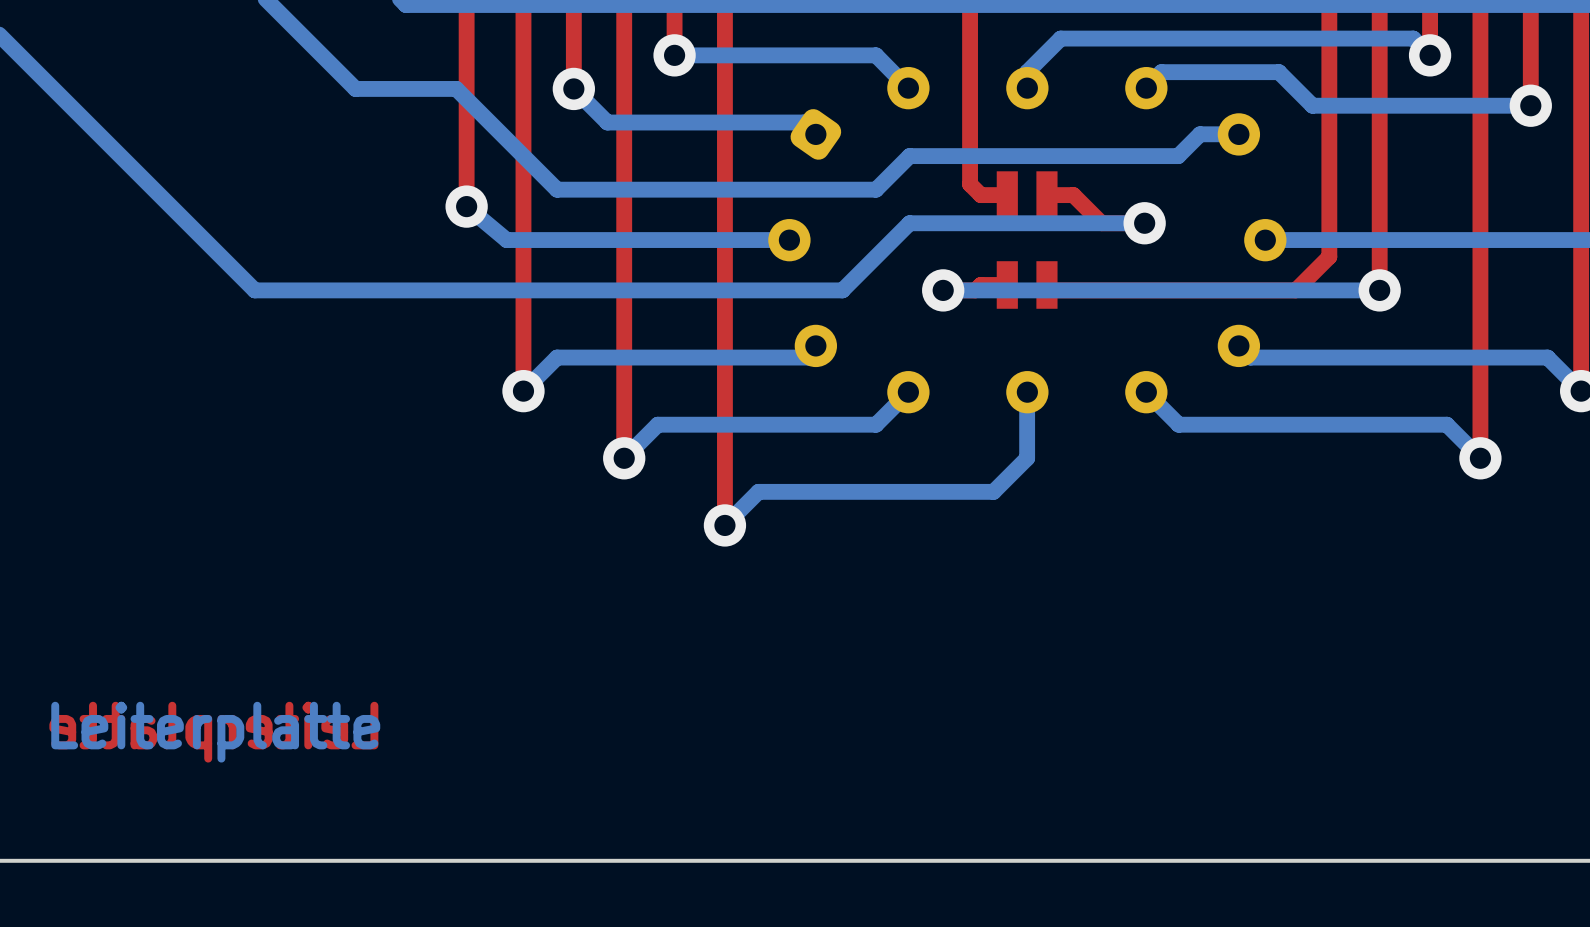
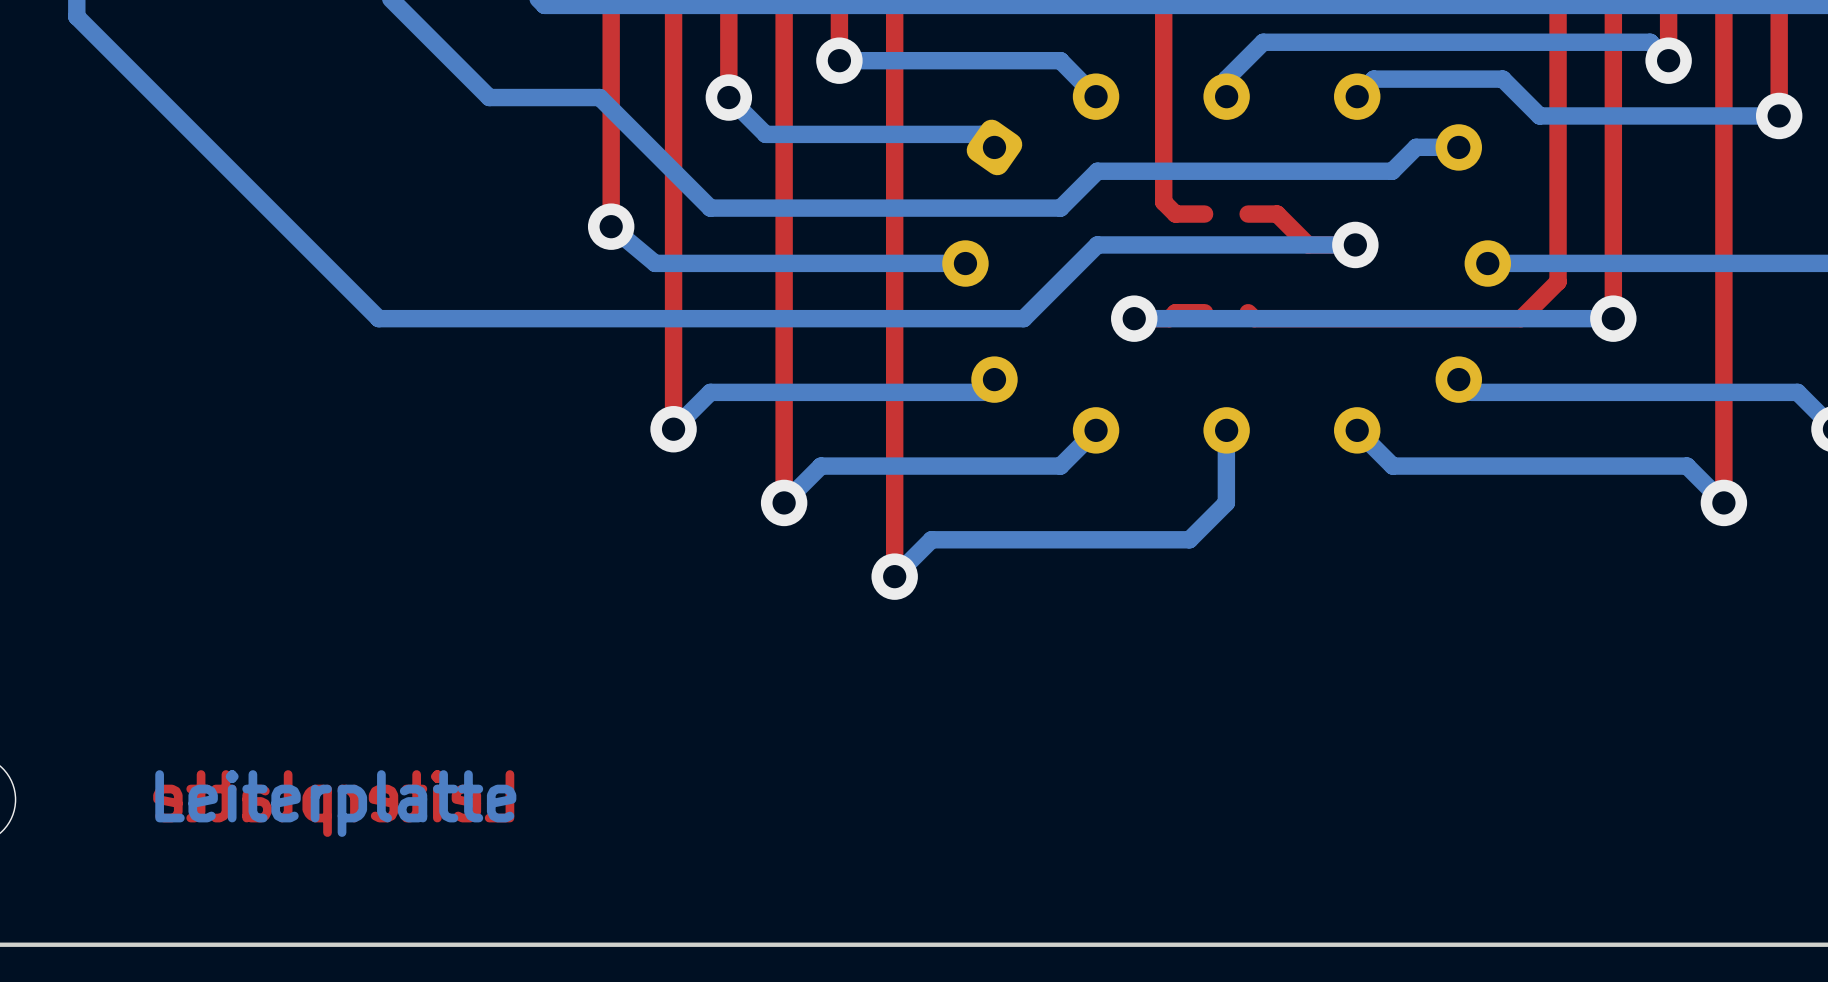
part: (1027, 240) -> none

